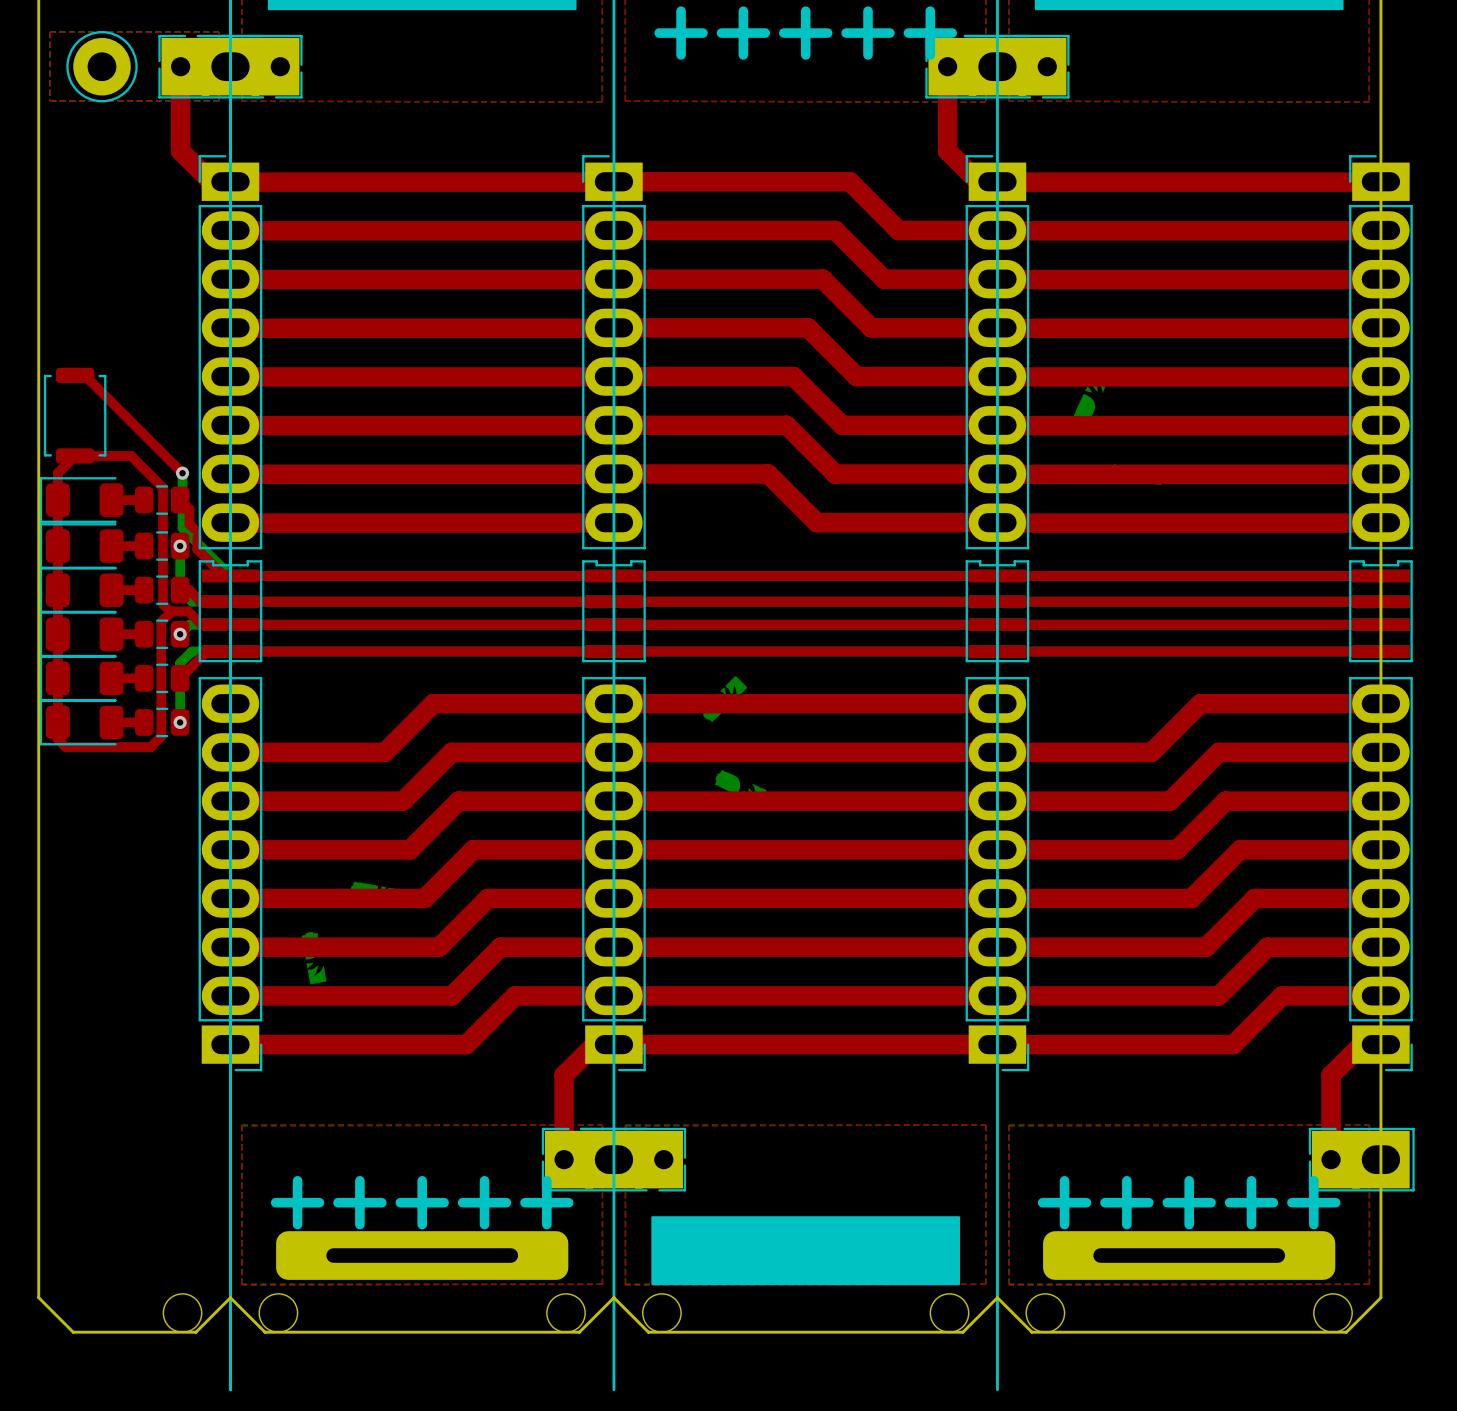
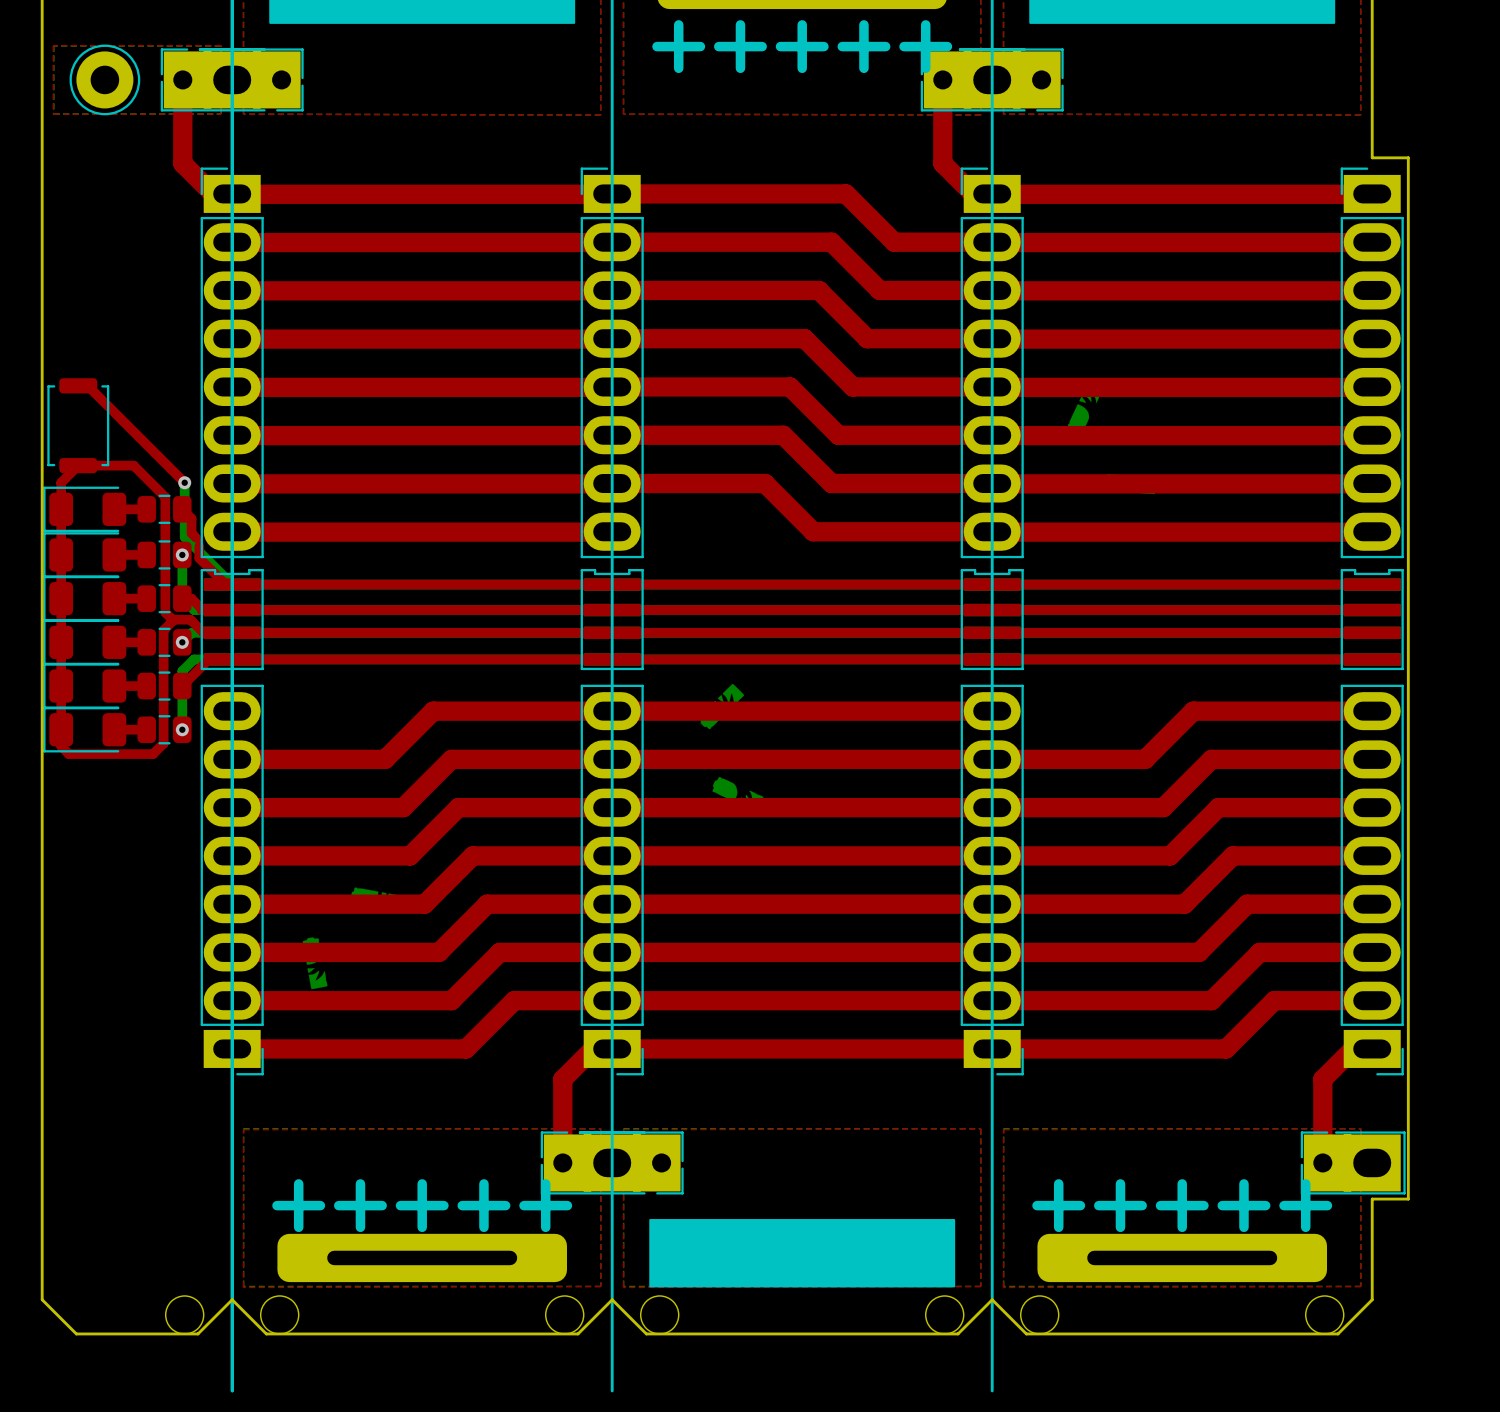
board edge: (1380, 145) (1380, 1196) -> (1372, 157) (1408, 157) (1408, 1199) (1372, 1199)

